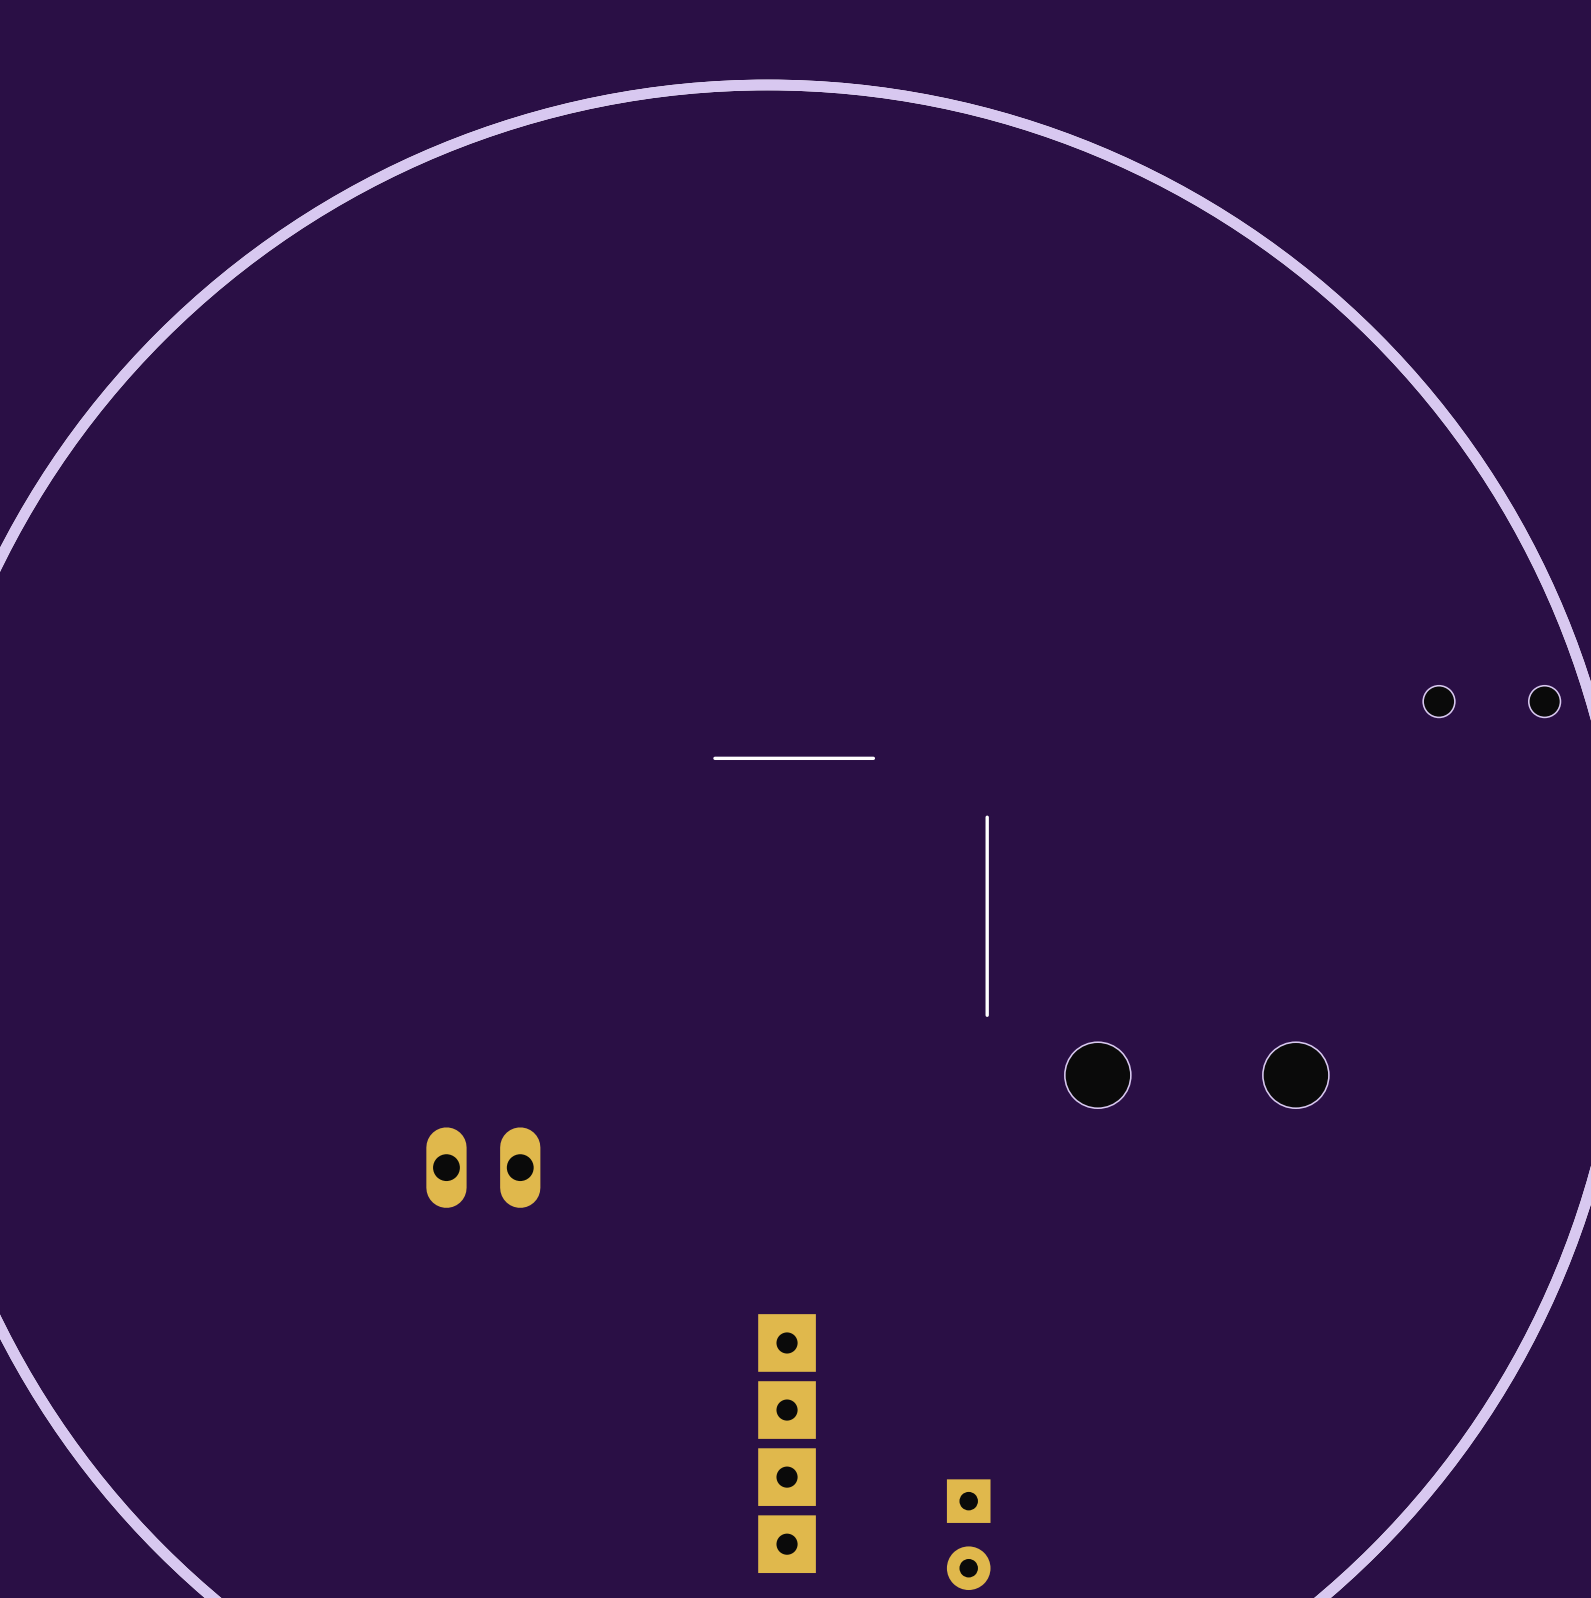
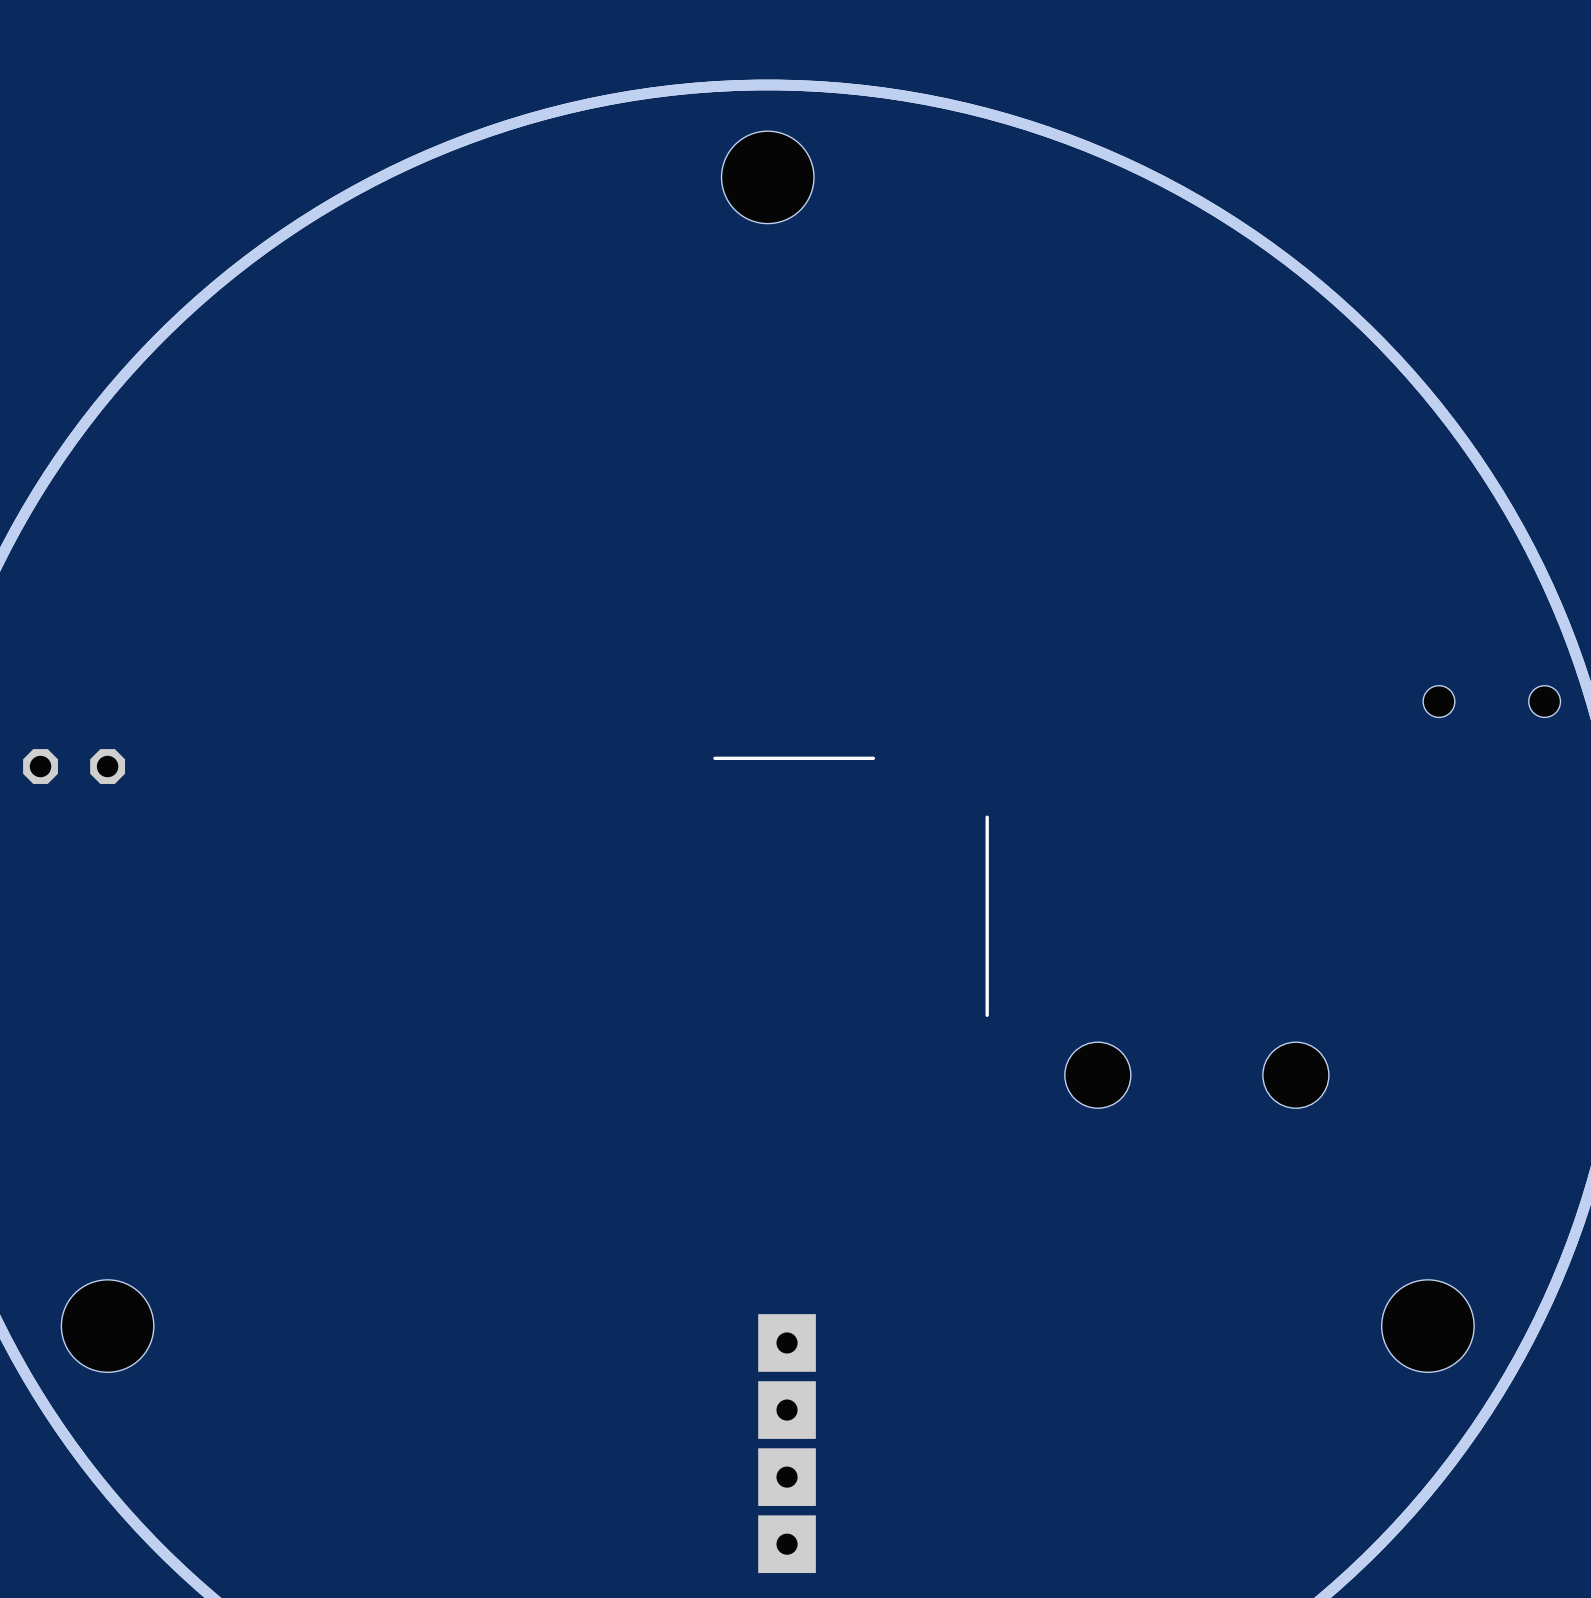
hole: none -> (767, 177)
part: none -> (74, 766)
part: (483, 1167) -> none
hole: none -> (107, 1326)
hole: none -> (1427, 1326)
part: (968, 1534) -> none

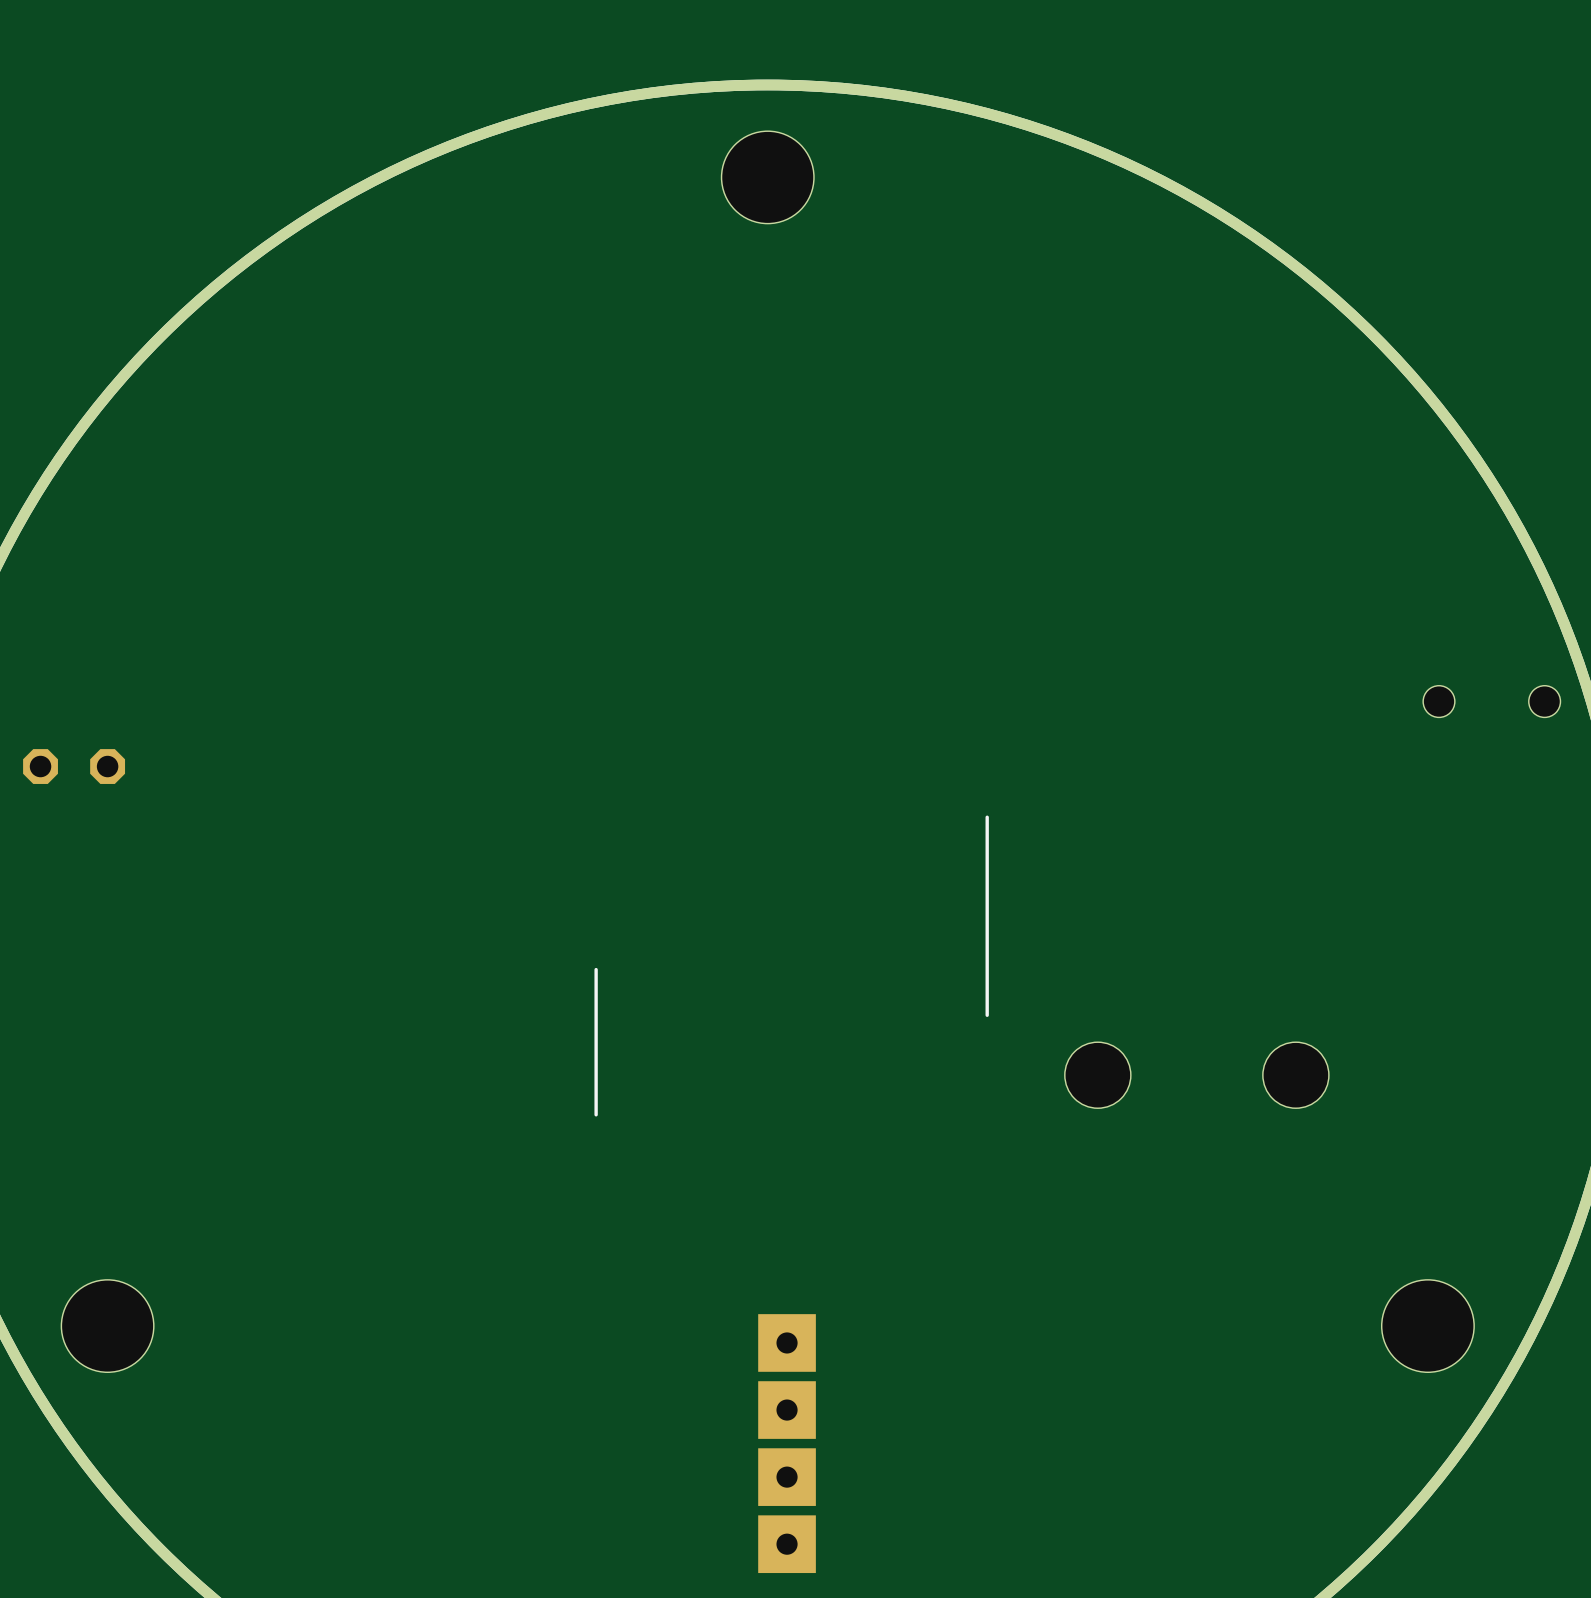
line: (873, 758) (714, 758) -> none
line: none -> (596, 969) (596, 1114)

